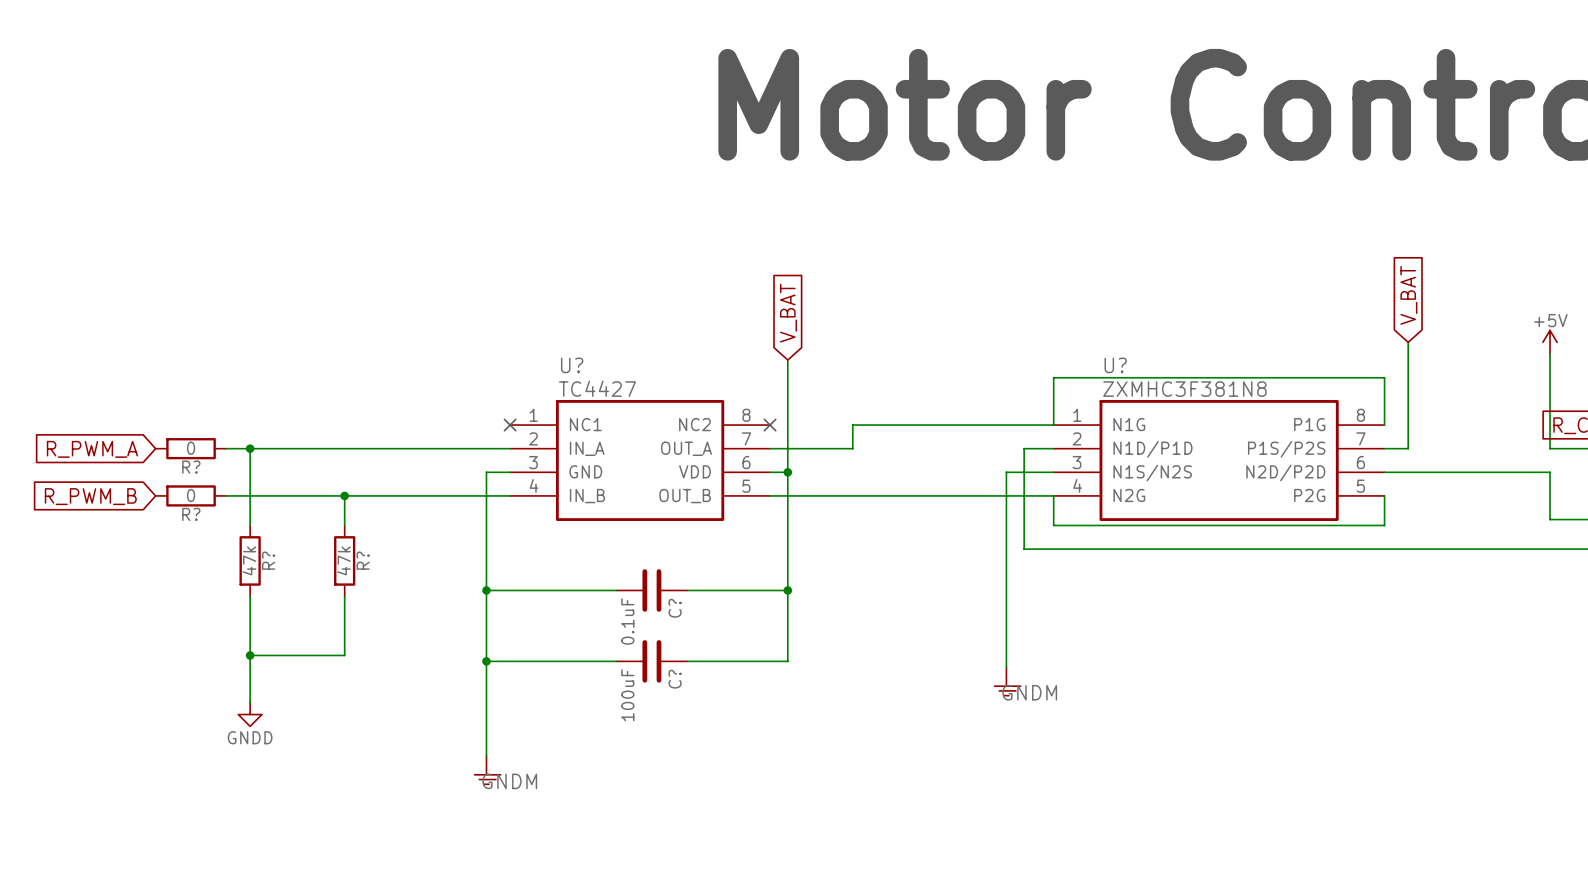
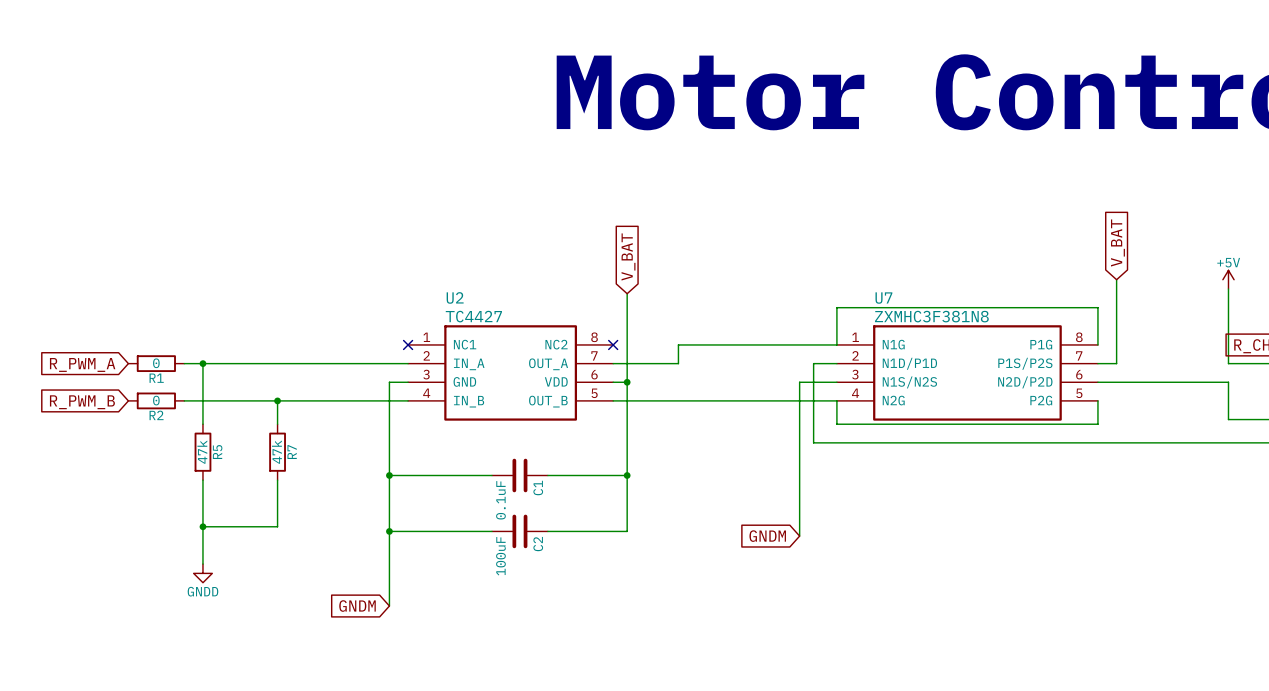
U? name: U? (572, 365) -> U2 (455, 297)
U? name: U? (1115, 365) -> U7 (883, 298)
R? name: R? (191, 467) -> R1 (156, 378)
R? name: R? (191, 514) -> R2 (156, 415)
R? name: R? (268, 560) -> R5 (217, 452)
R? name: R? (363, 560) -> R7 (292, 452)
C? name: C? (675, 608) -> C1 (538, 488)
global label: none -> GNDM (767, 536)
C? name: C? (675, 679) -> C2 (538, 544)
part: GNDM (1007, 681) -> none
global label: none -> GNDM (357, 606)
part: GNDM (487, 770) -> none

